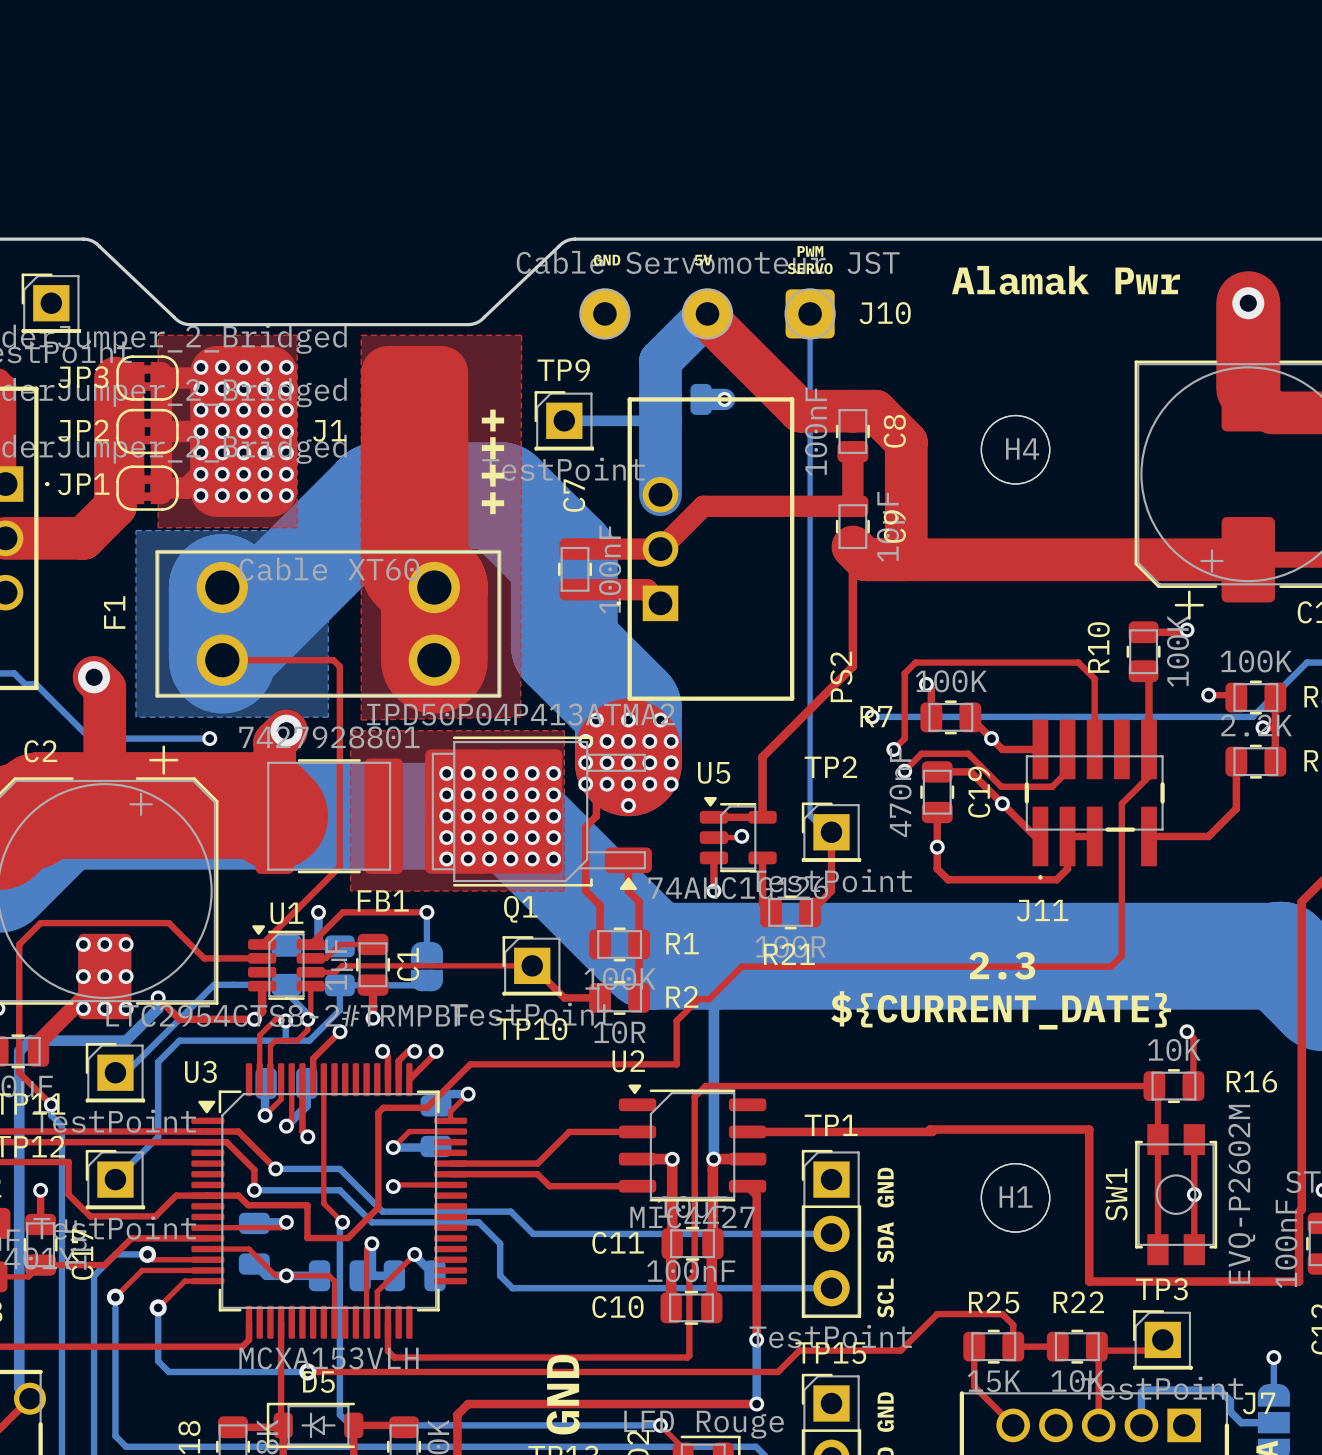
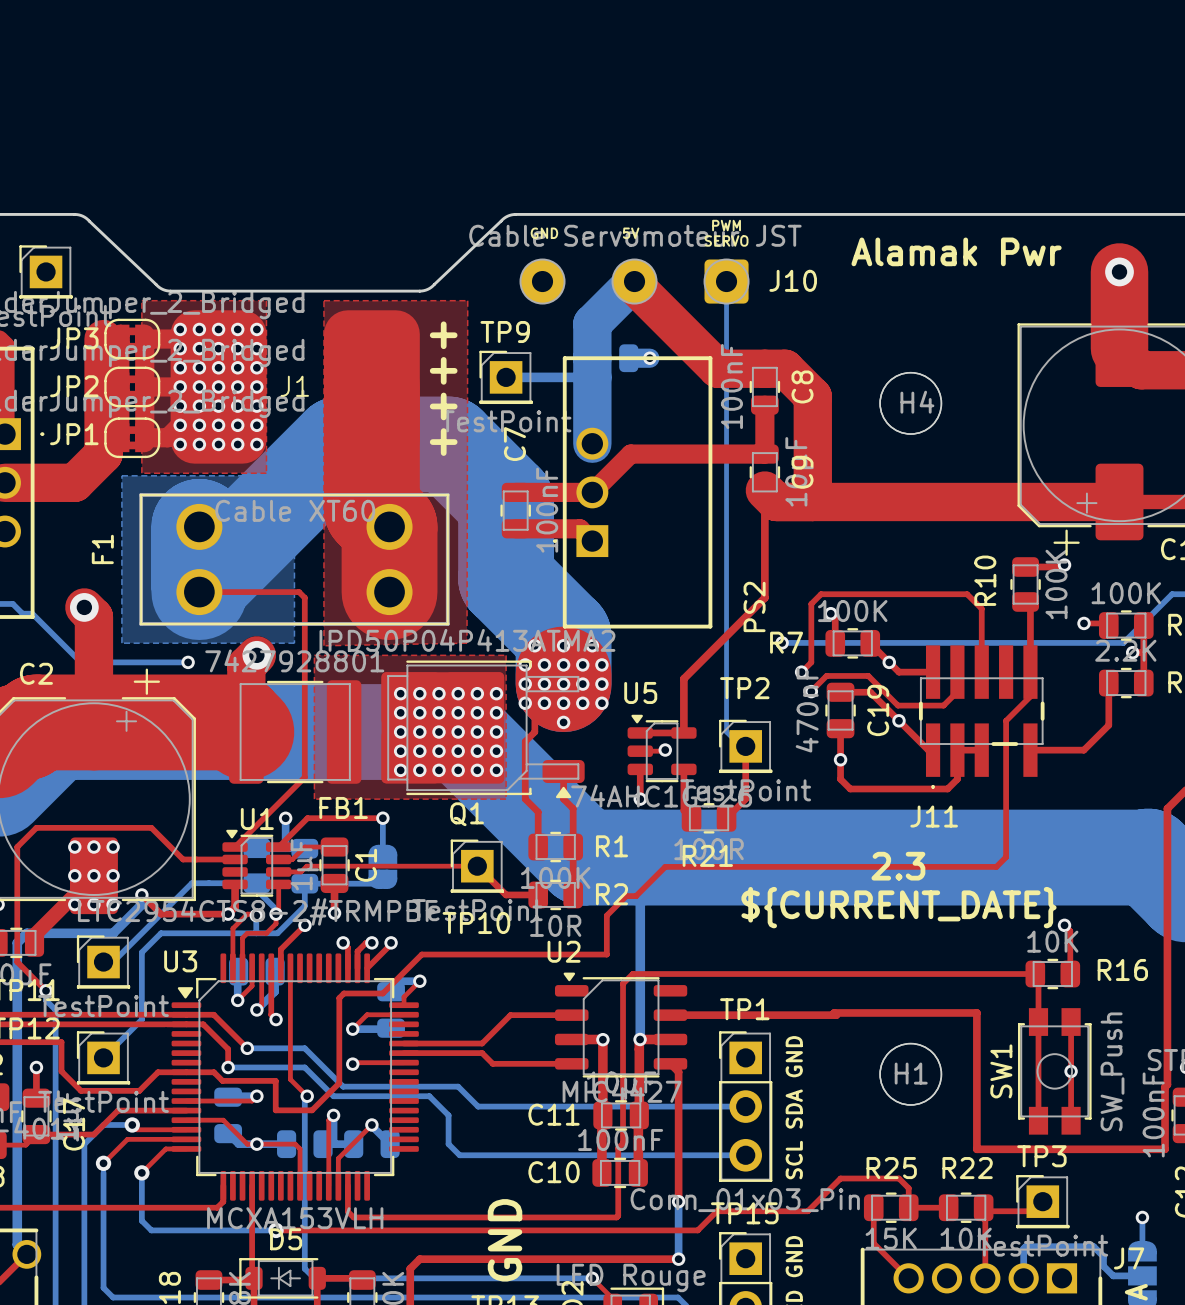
SW1 value: EVQ-P2602M (1241, 1194) -> SW_Push (1112, 1071)
TP1 value: TestPoint (830, 1336) -> Conn_01x03_Pin (745, 1200)

